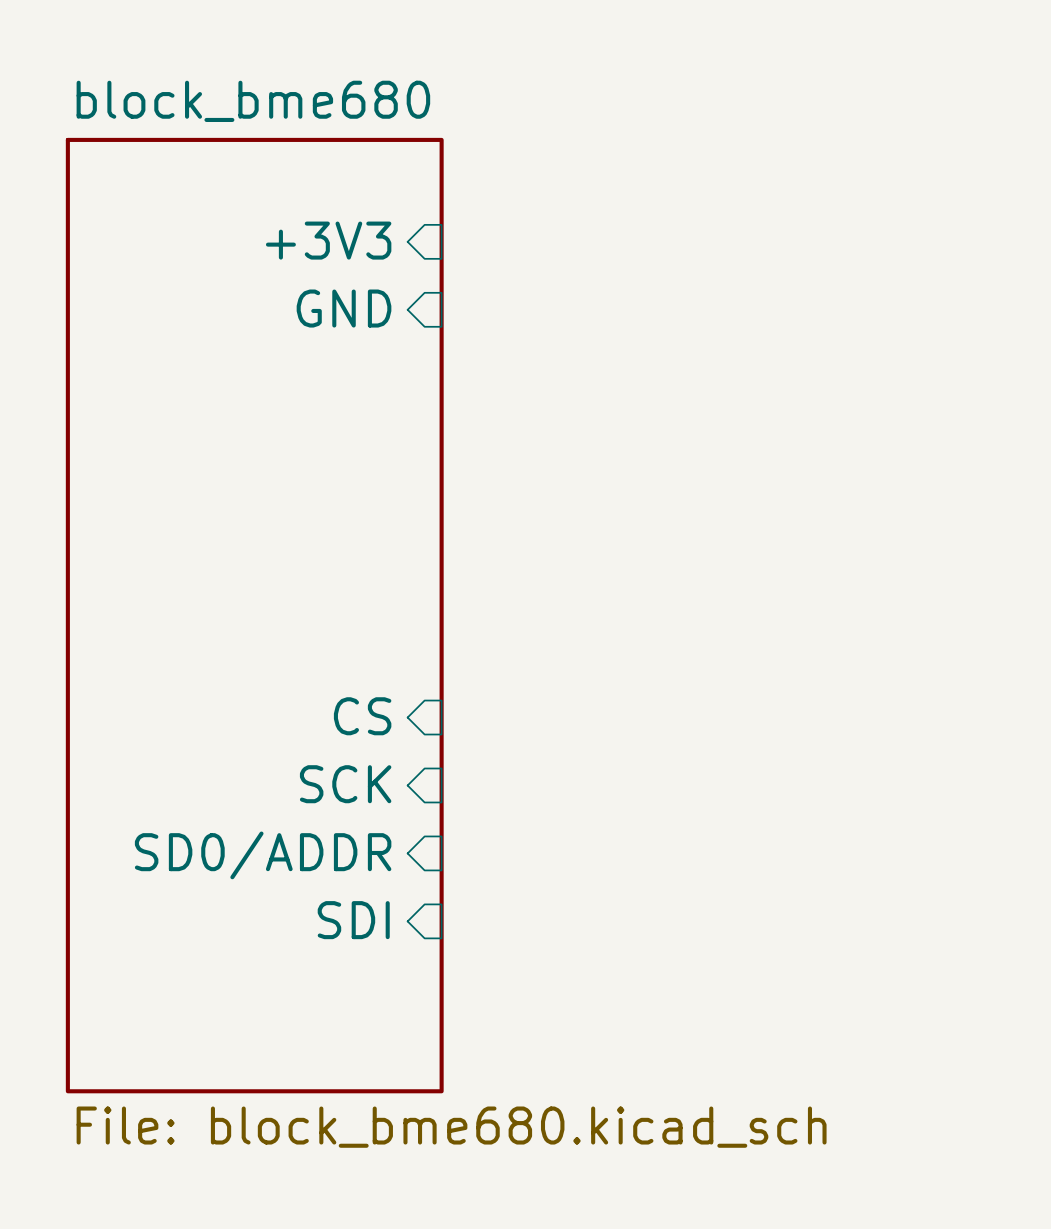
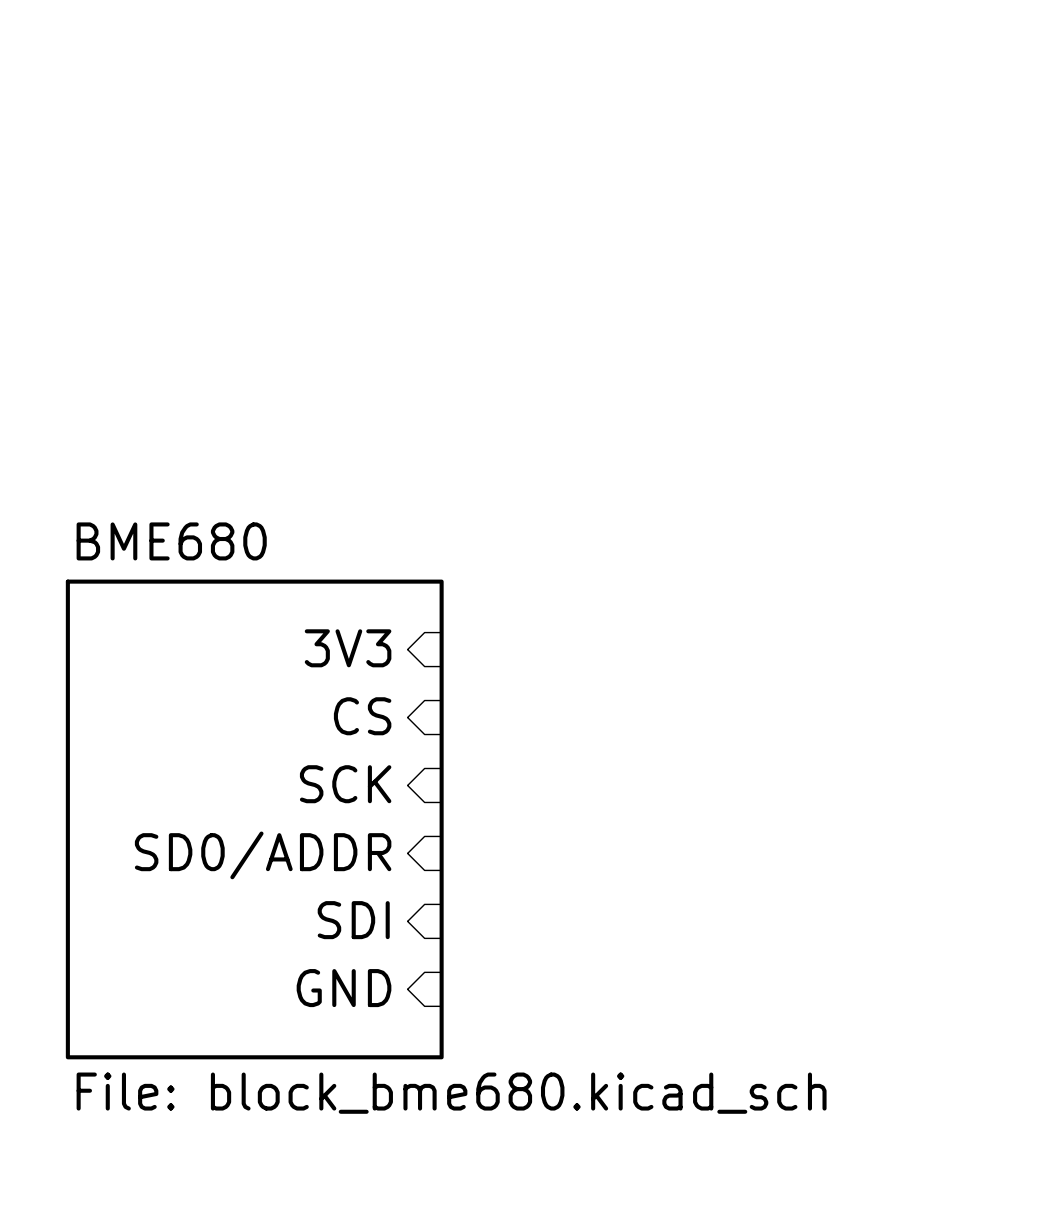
sheet pin: +3V3 (328, 240) -> none
sheet pin: GND (344, 308) -> none
sheet block_bme680: File: block_bme680.kicad_sch (254, 615) -> none
sheet pin: none -> 3V3 (348, 648)
sheet BME680: none -> File: block_bme680.kicad_sch (254, 819)
sheet pin: none -> GND (344, 988)

